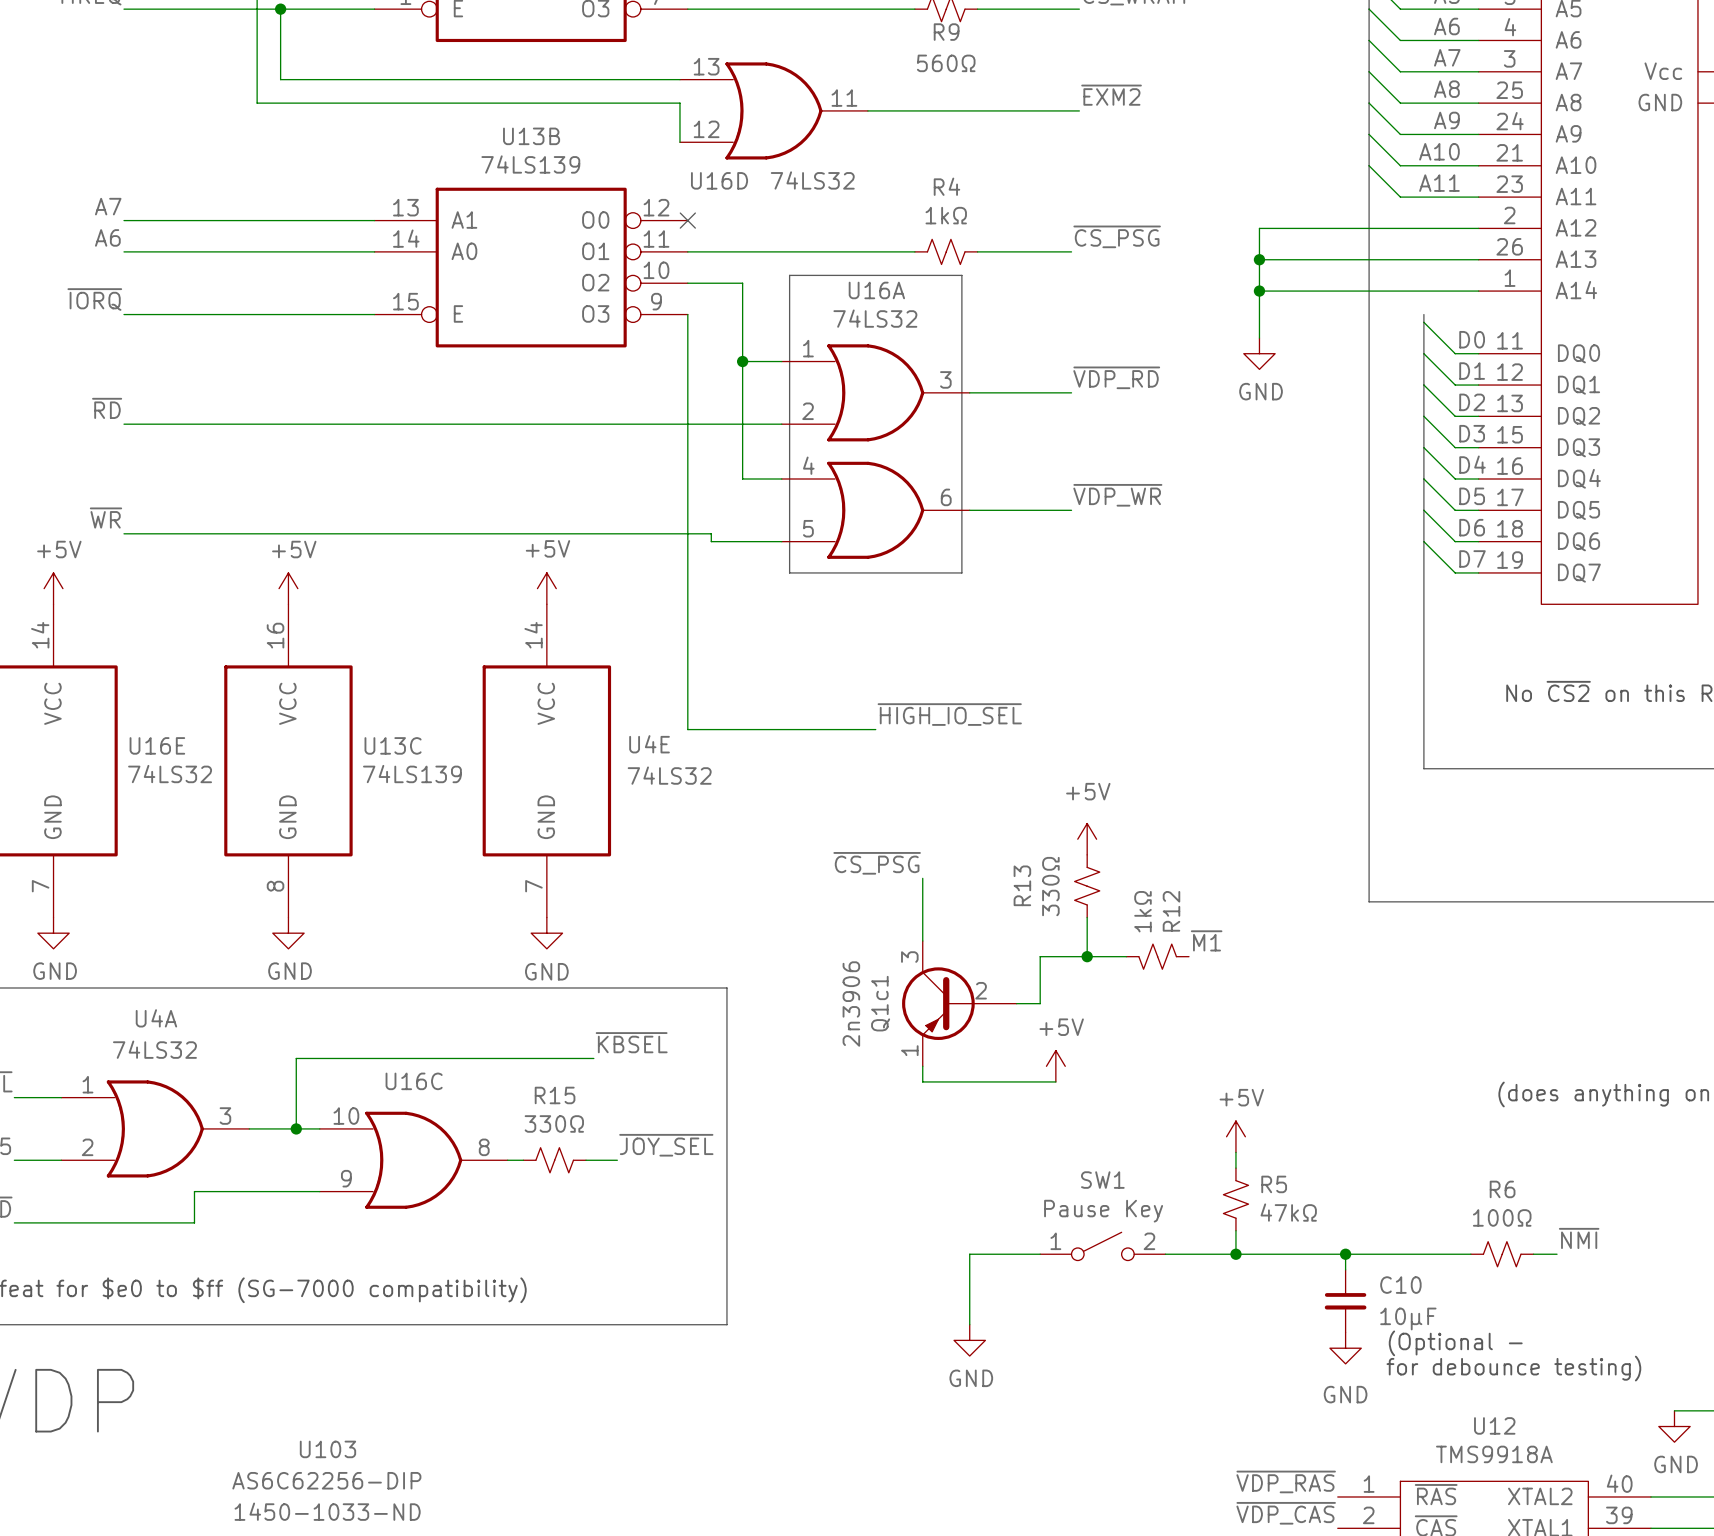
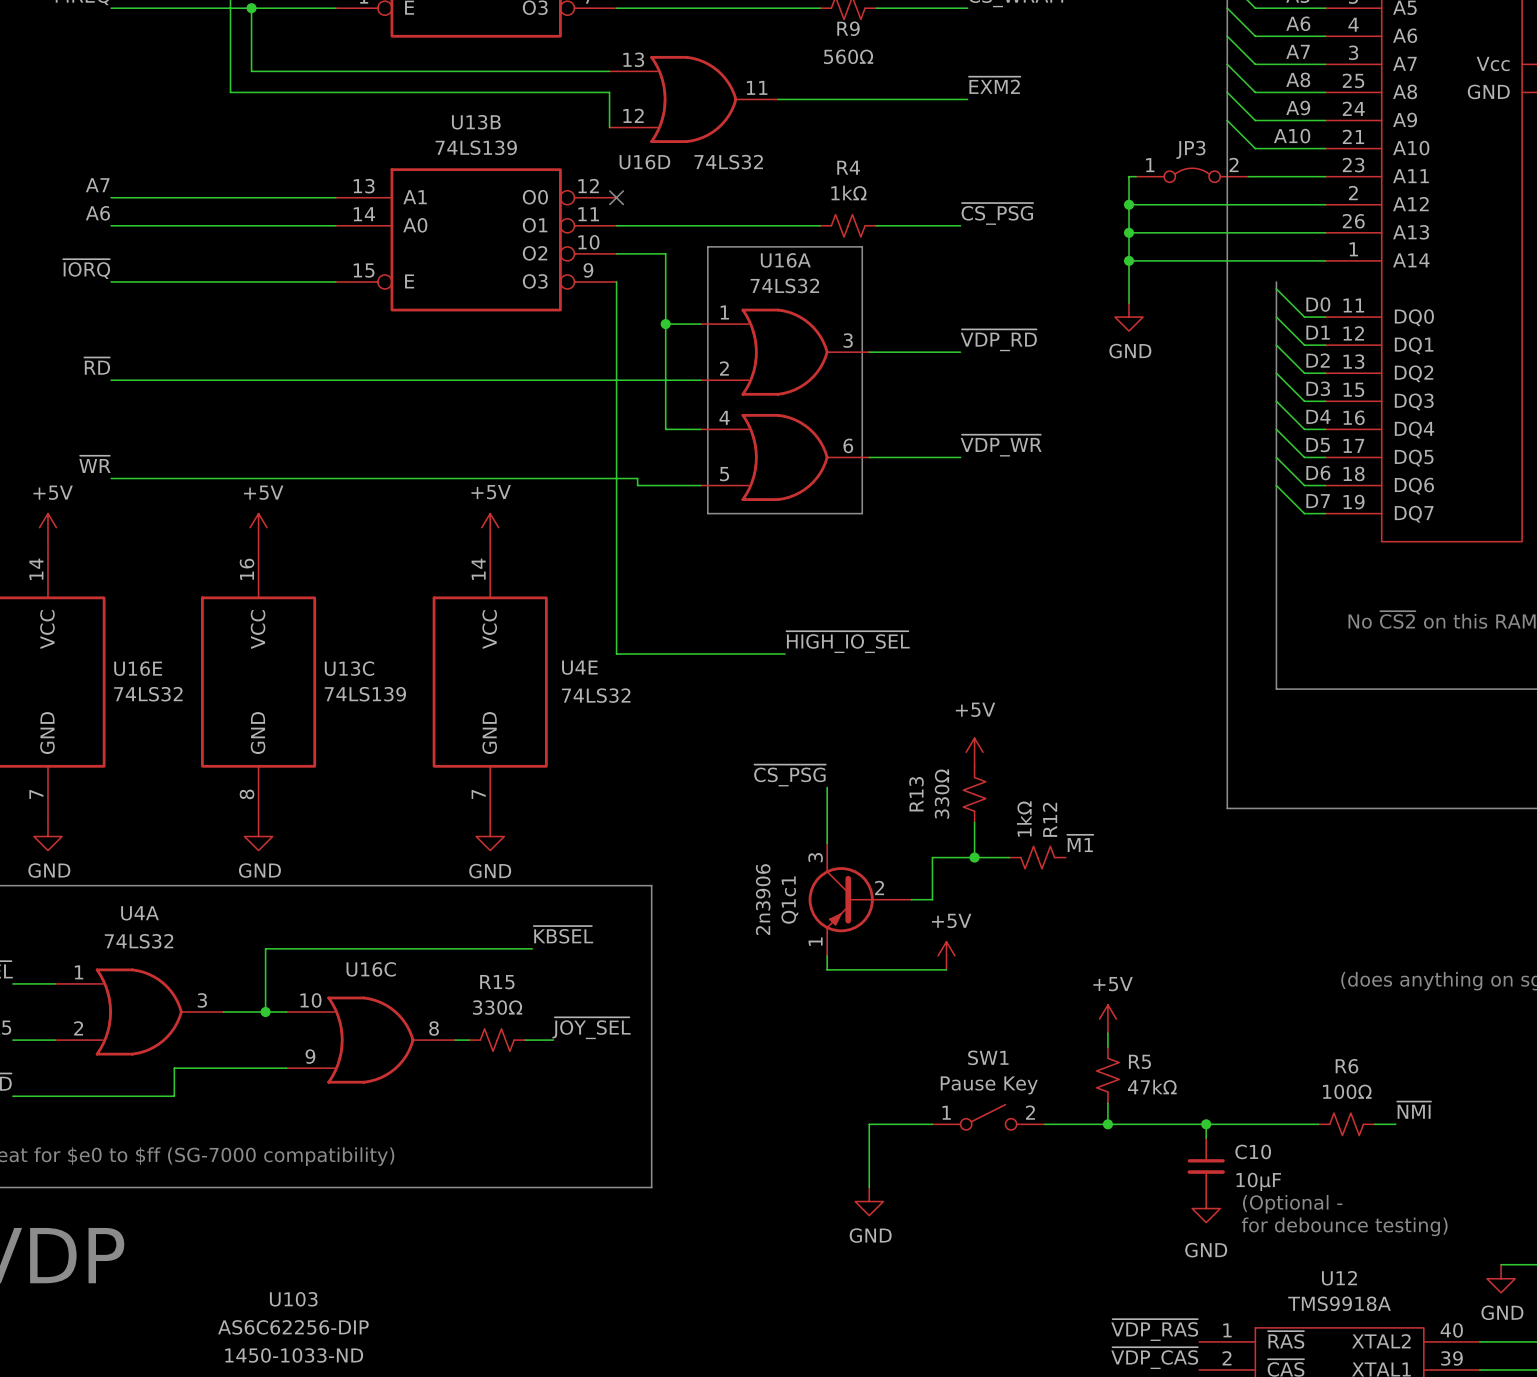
wire: (1369, 165) (1400, 197) -> (1248, 176) (1255, 176)
label: A11 (1439, 183) -> none
JP3: none -> (1192, 175)
wire: none -> (1136, 176) (1129, 176) (1129, 204)
junction: none -> (1129, 204)

